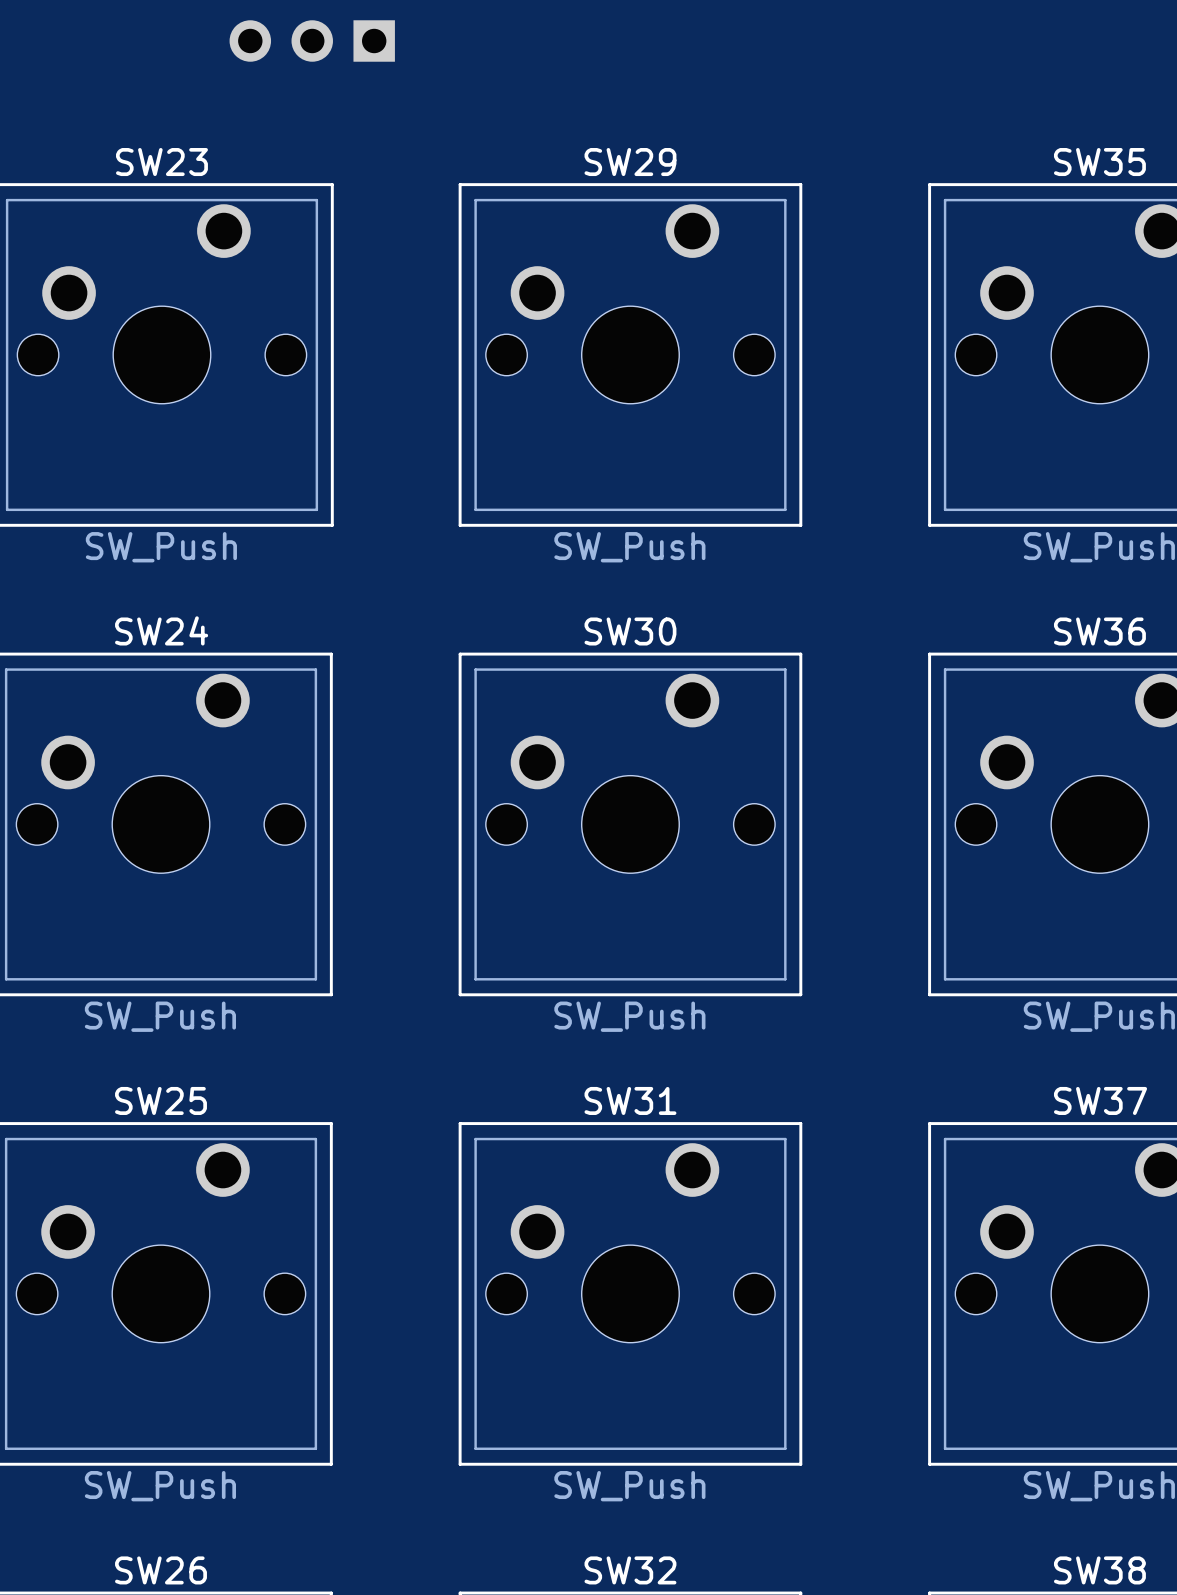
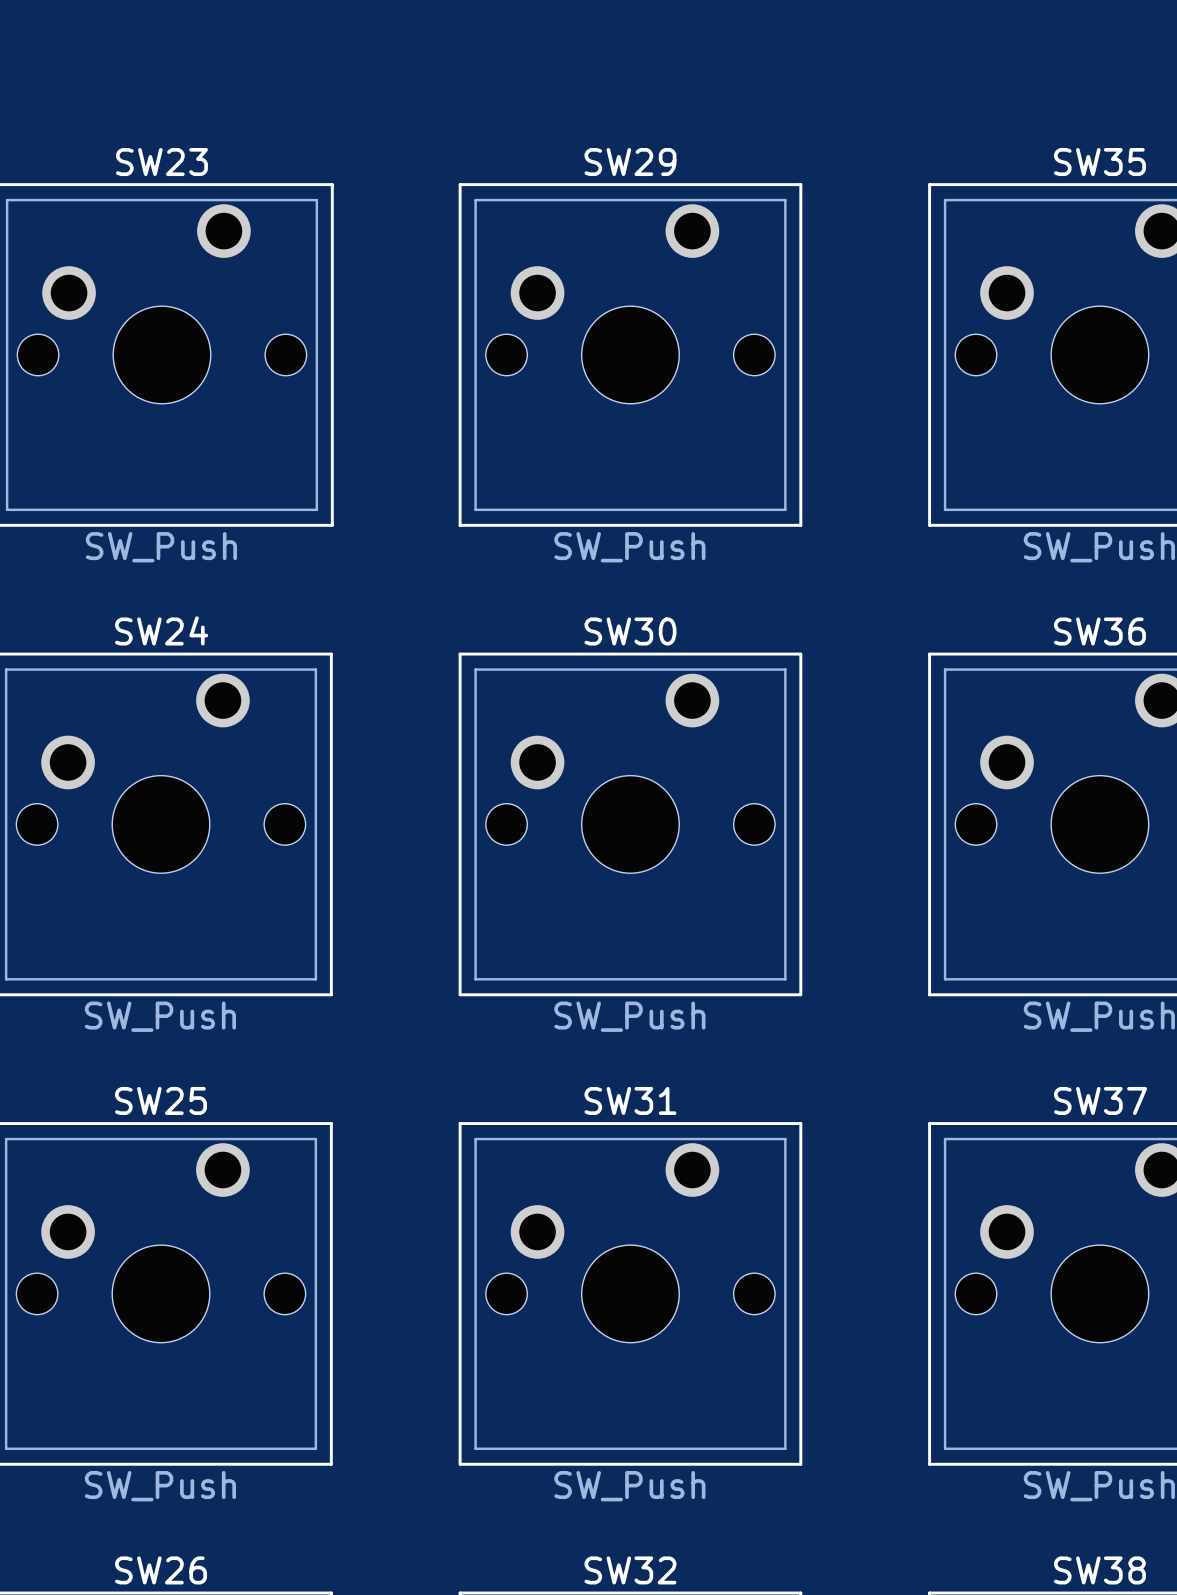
part: (312, 41) -> none

